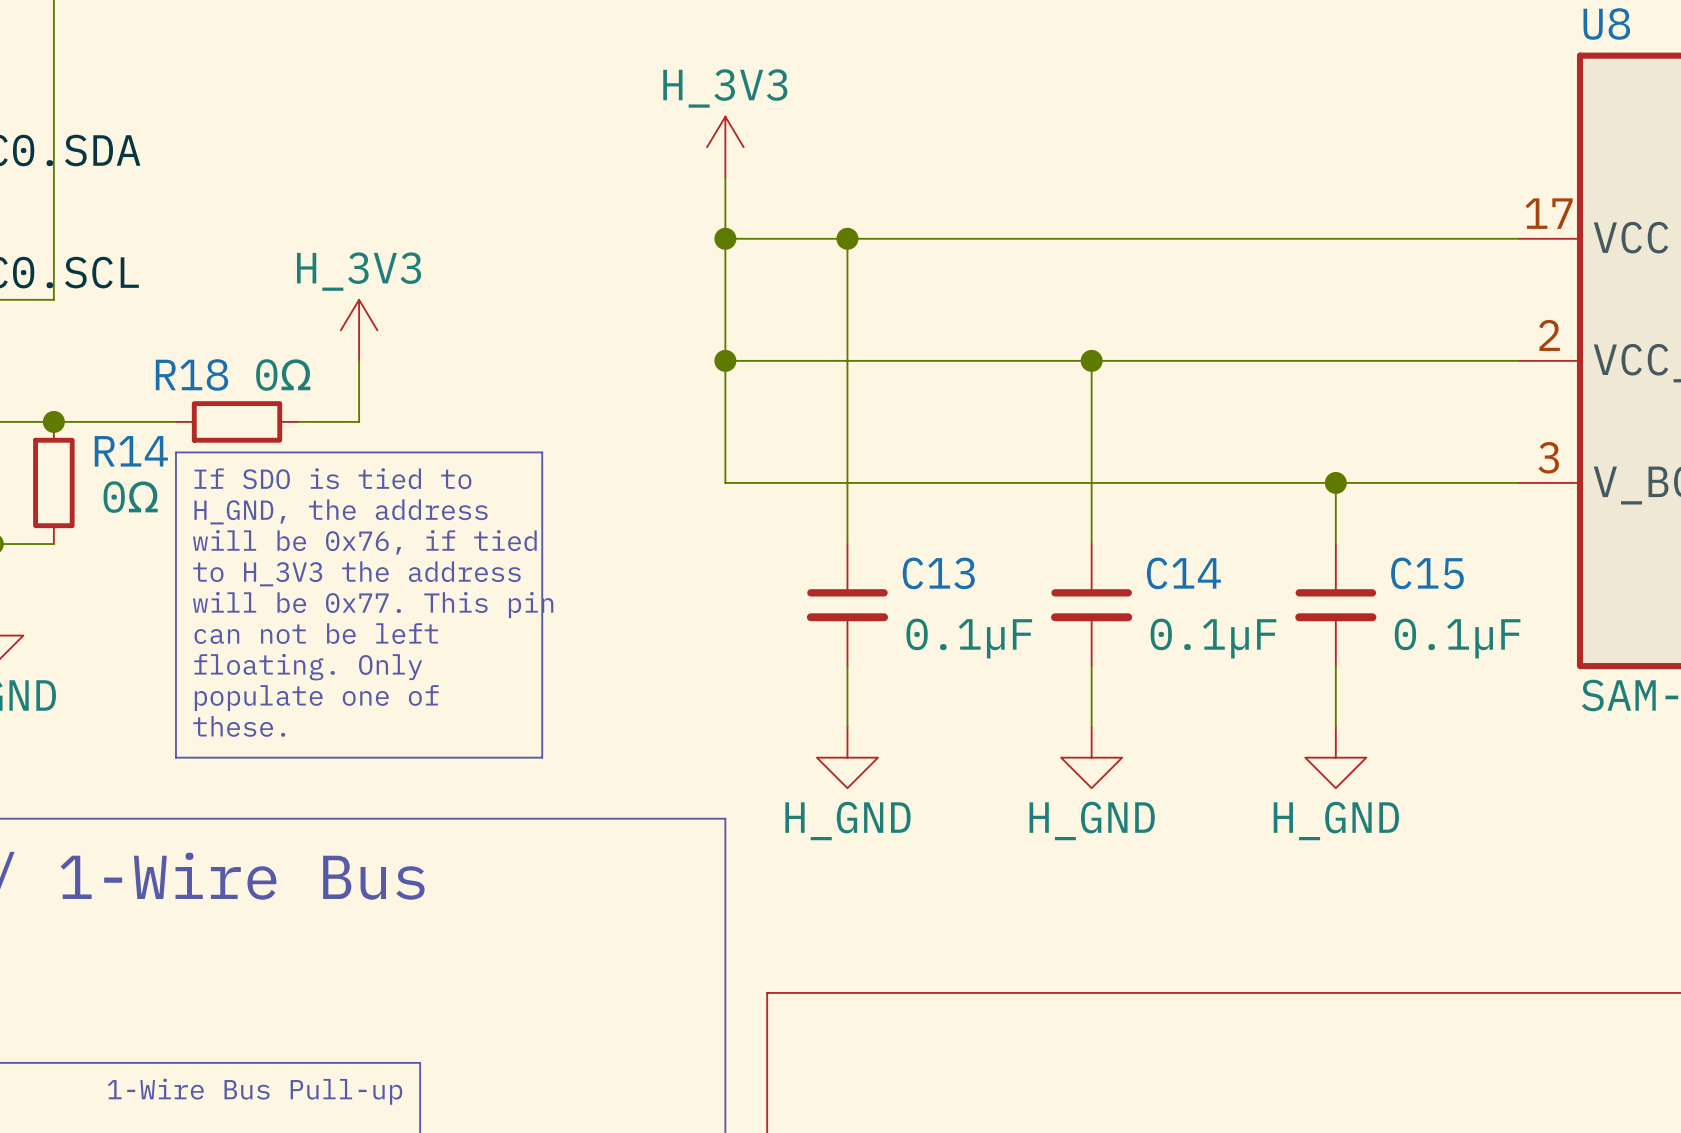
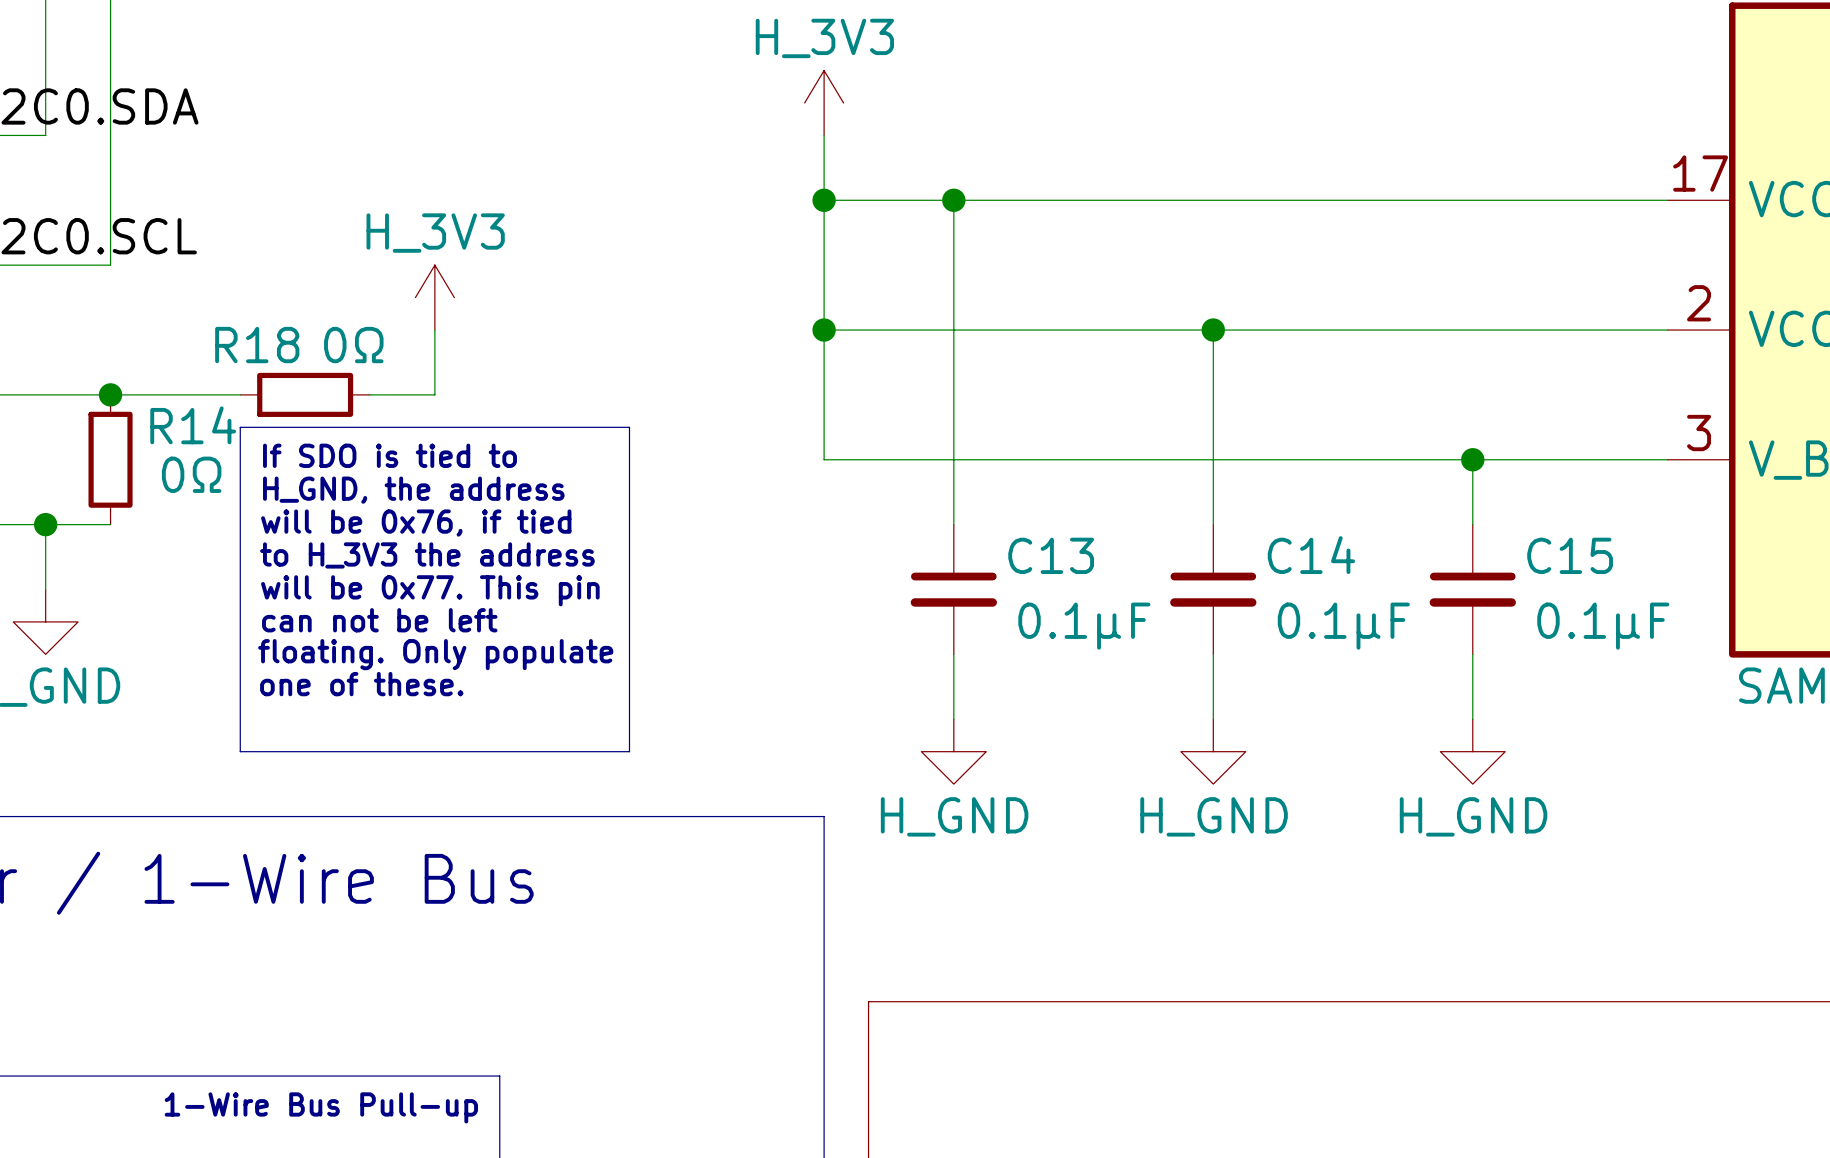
text: floating. Only (308, 667) -> floating. Only populate (435, 654)
text: populate one of (316, 698) -> one of these. (361, 684)
text: these. (239, 726) -> none

